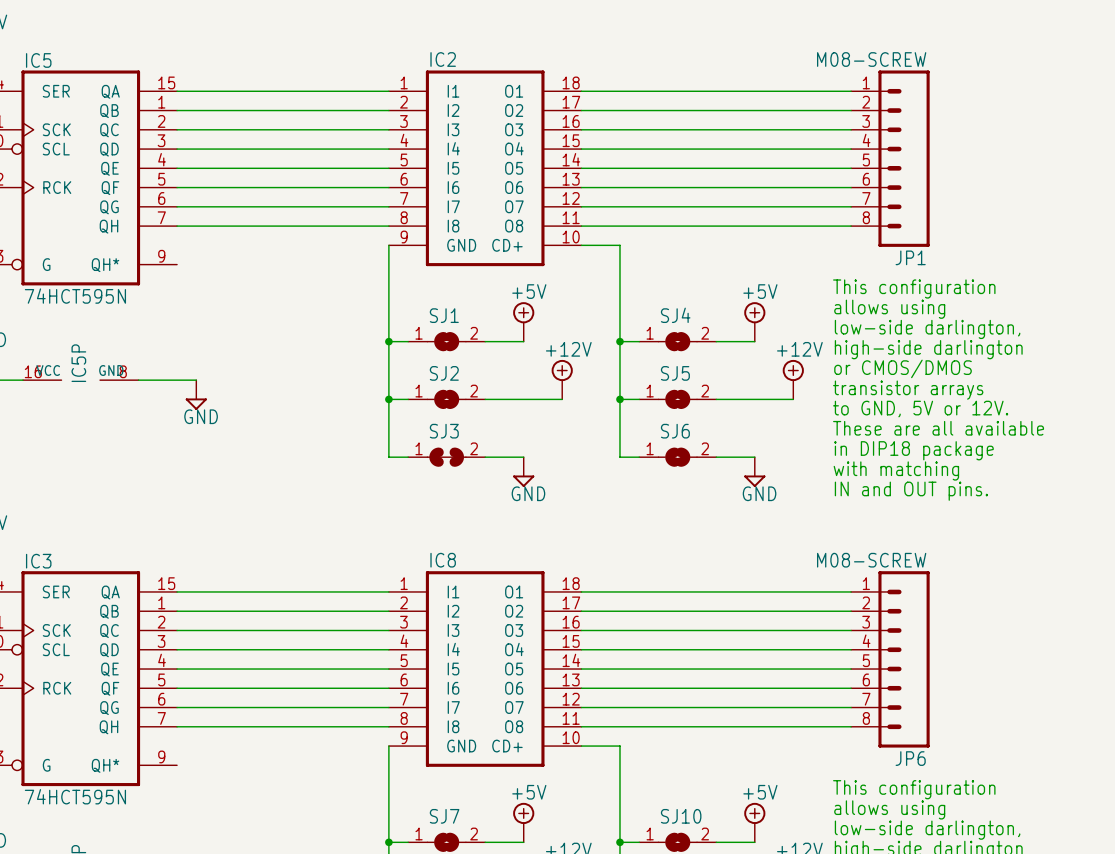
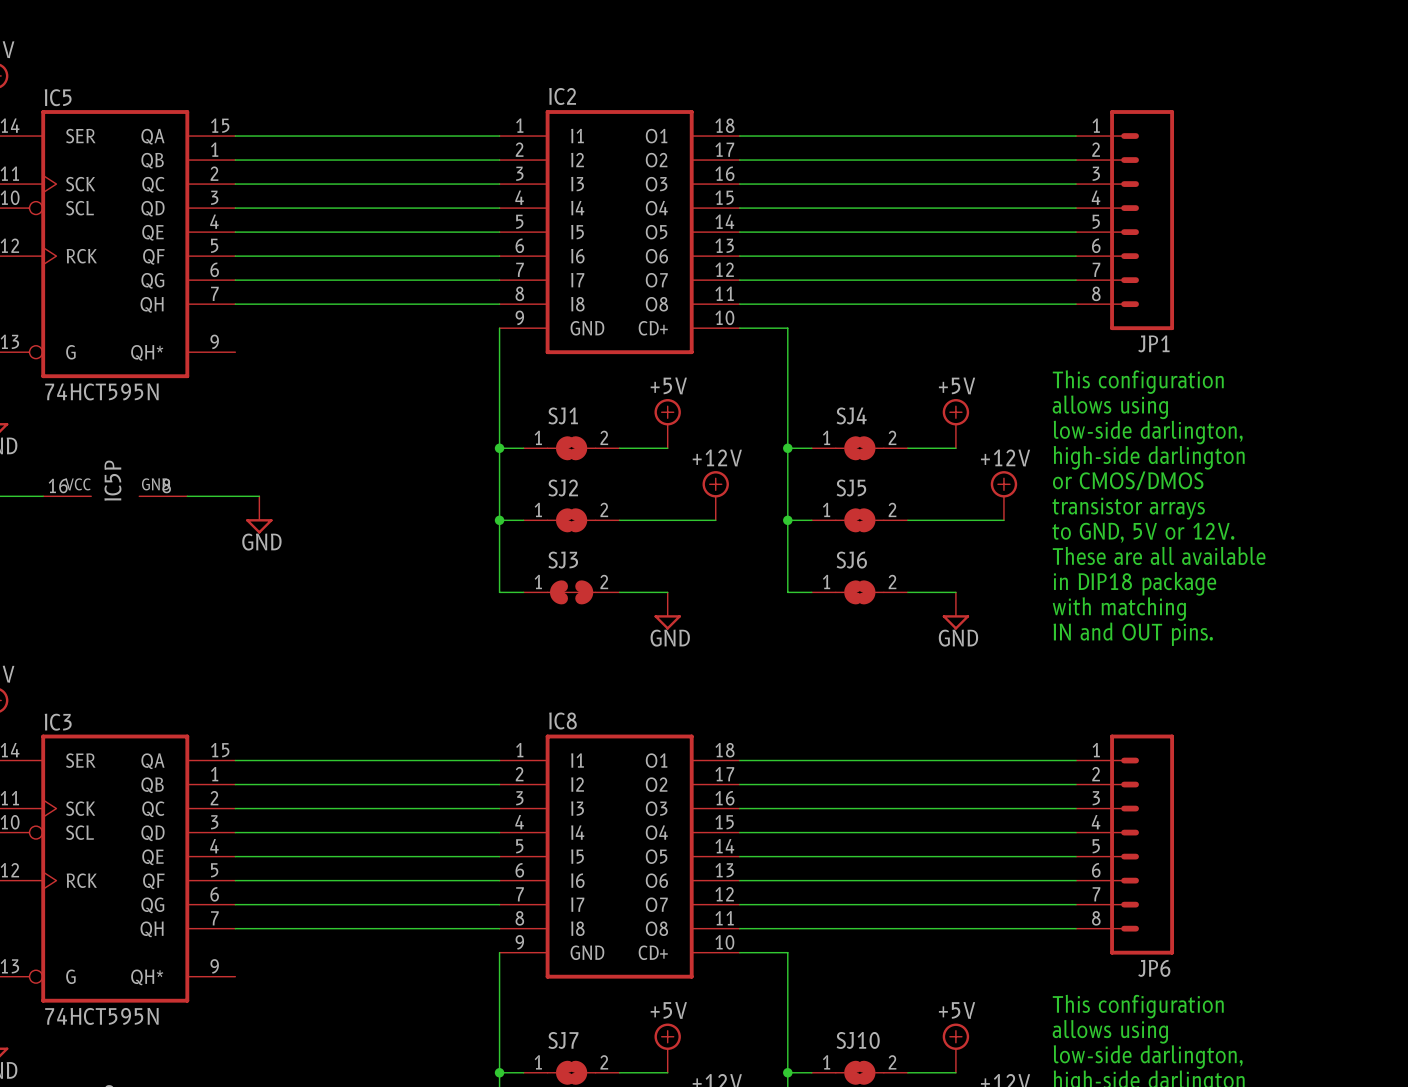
JP1 value: M08-SCREW (871, 59) -> none
JP6 value: M08-SCREW (871, 560) -> none

